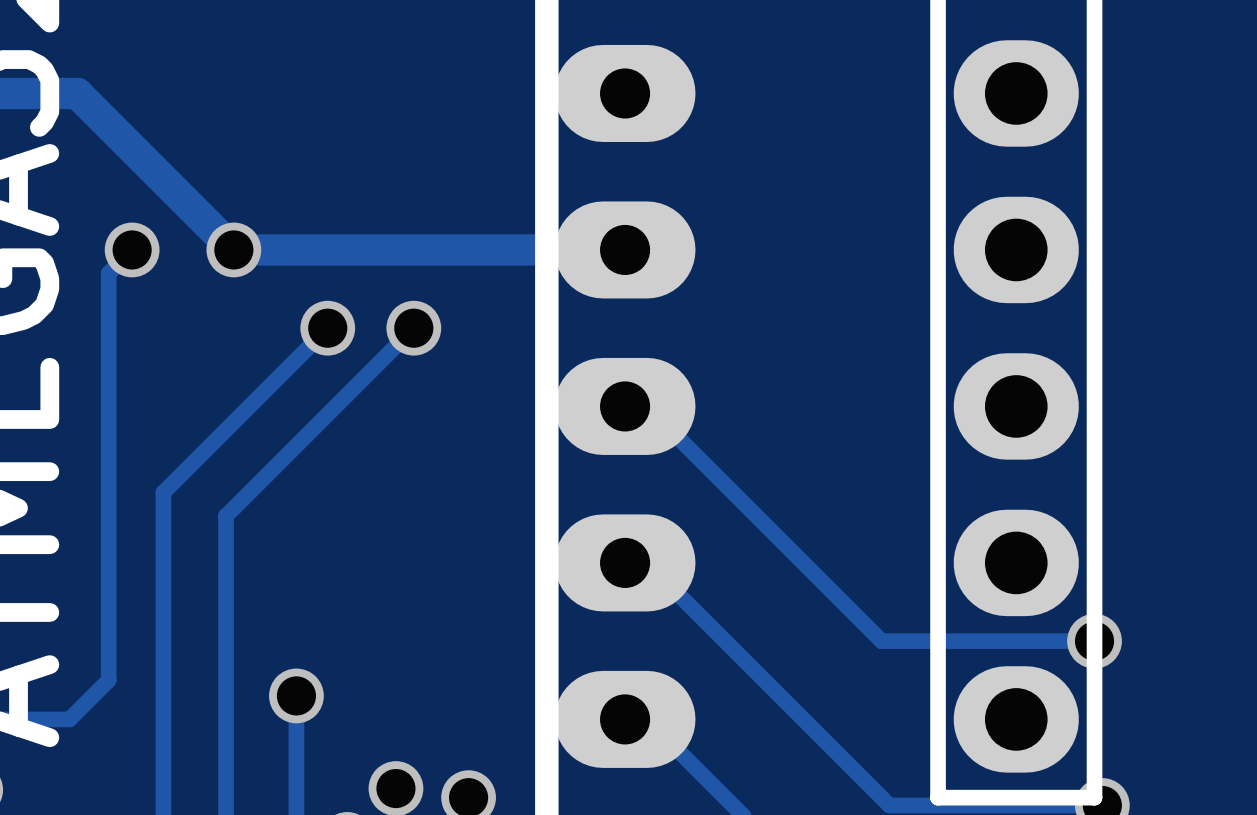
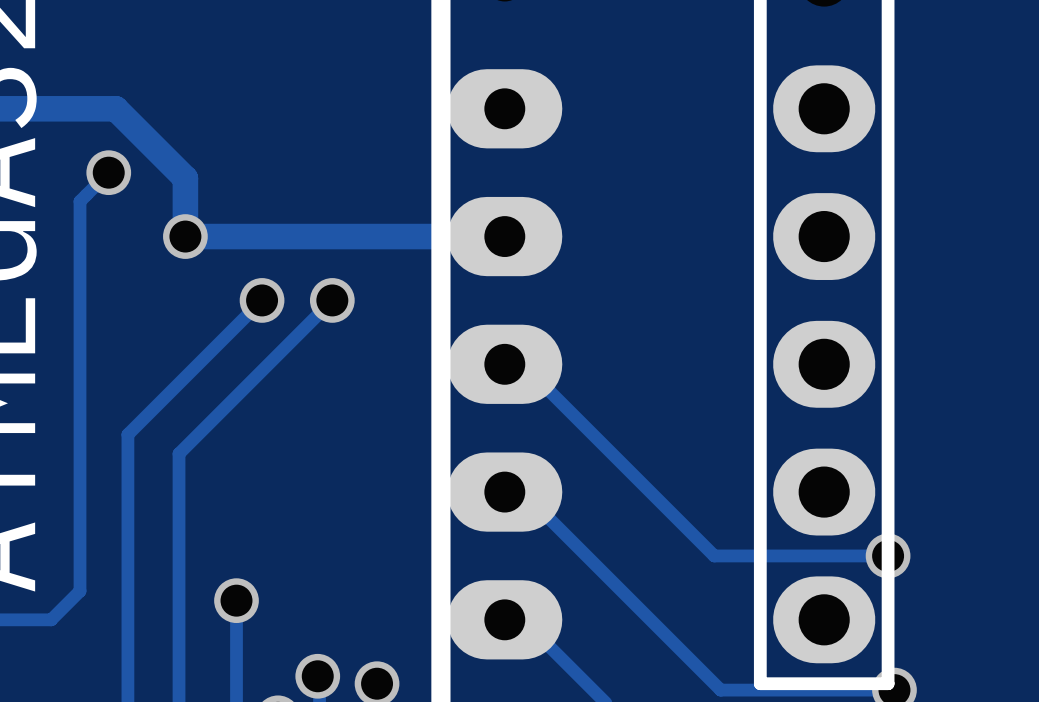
track: (77, 93) (233, 249) -> (57, 108) (115, 108) (185, 178) (185, 236)
track: (132, 249) (108, 273) (108, 680) (104, 684) -> (108, 172) (80, 201) (80, 591)
via position: (132, 249) -> (108, 172)

